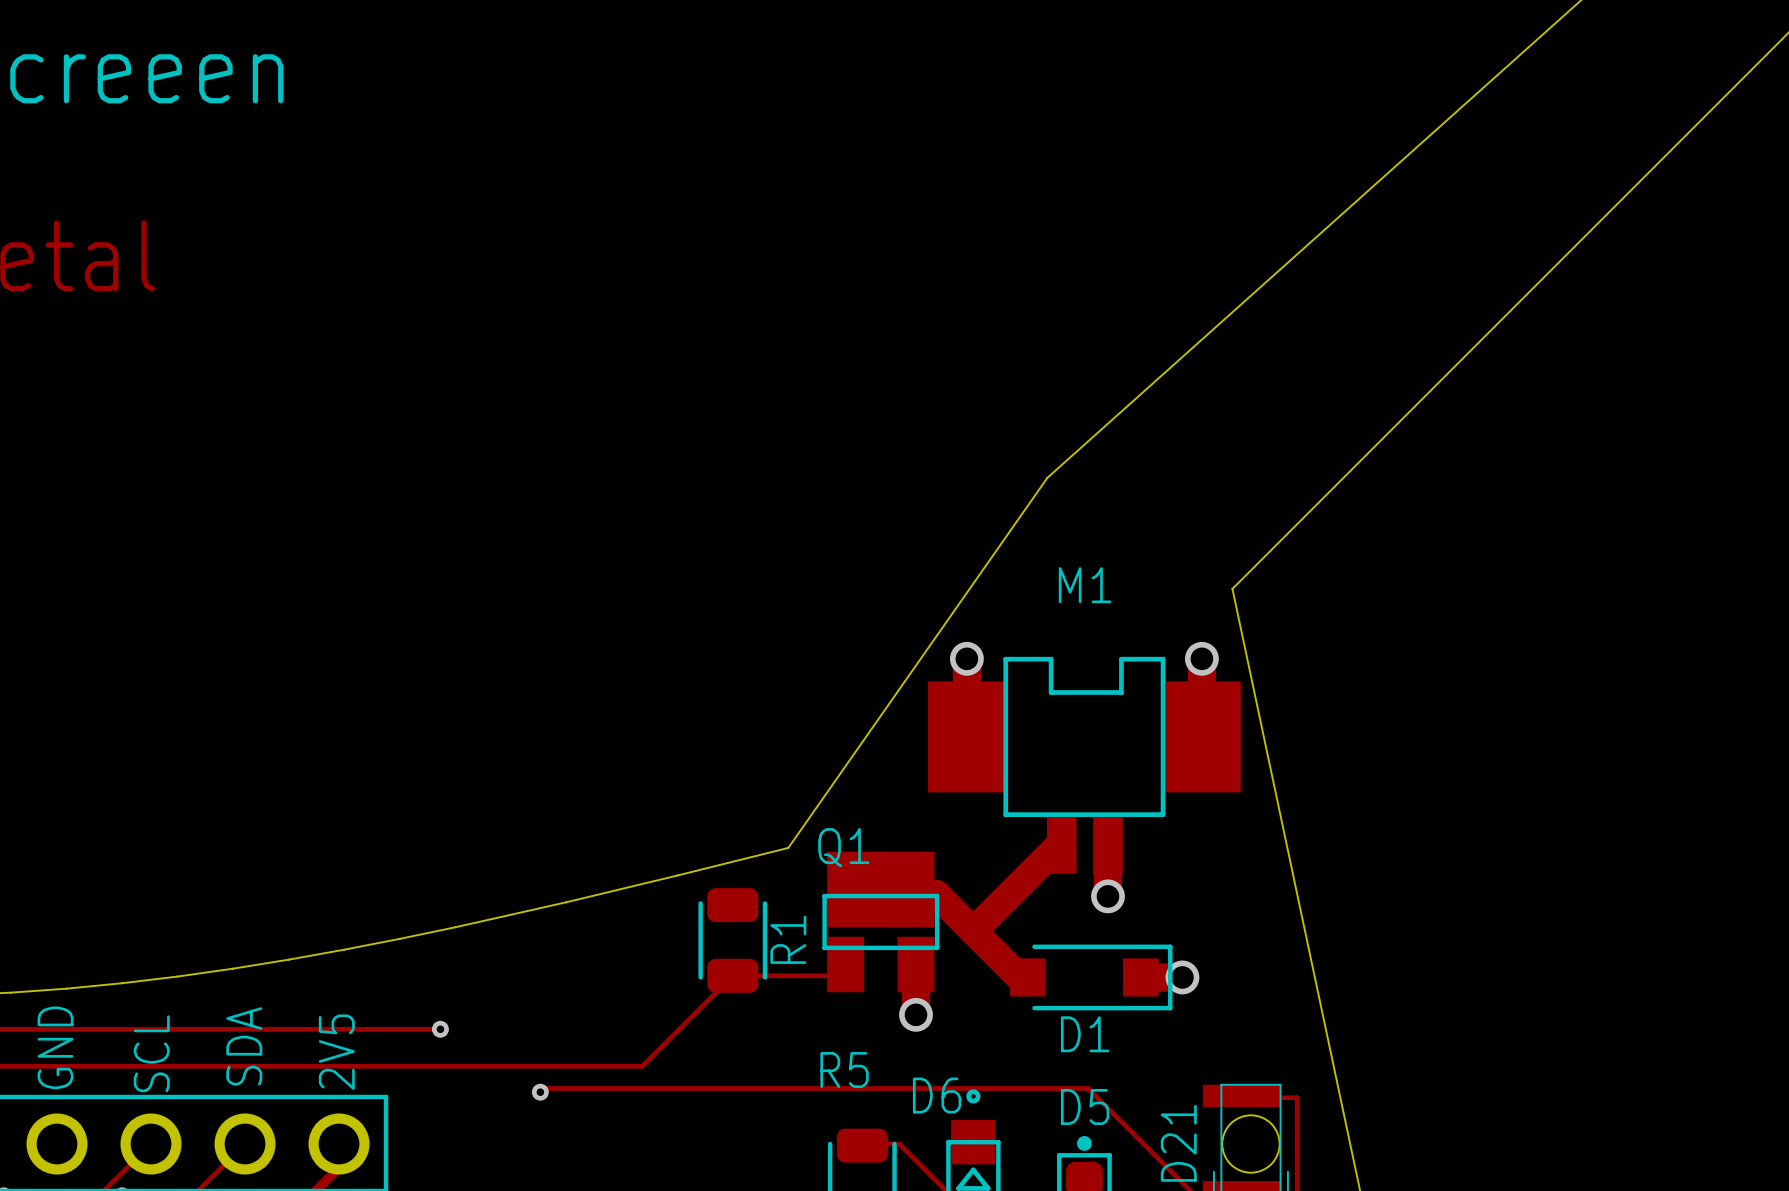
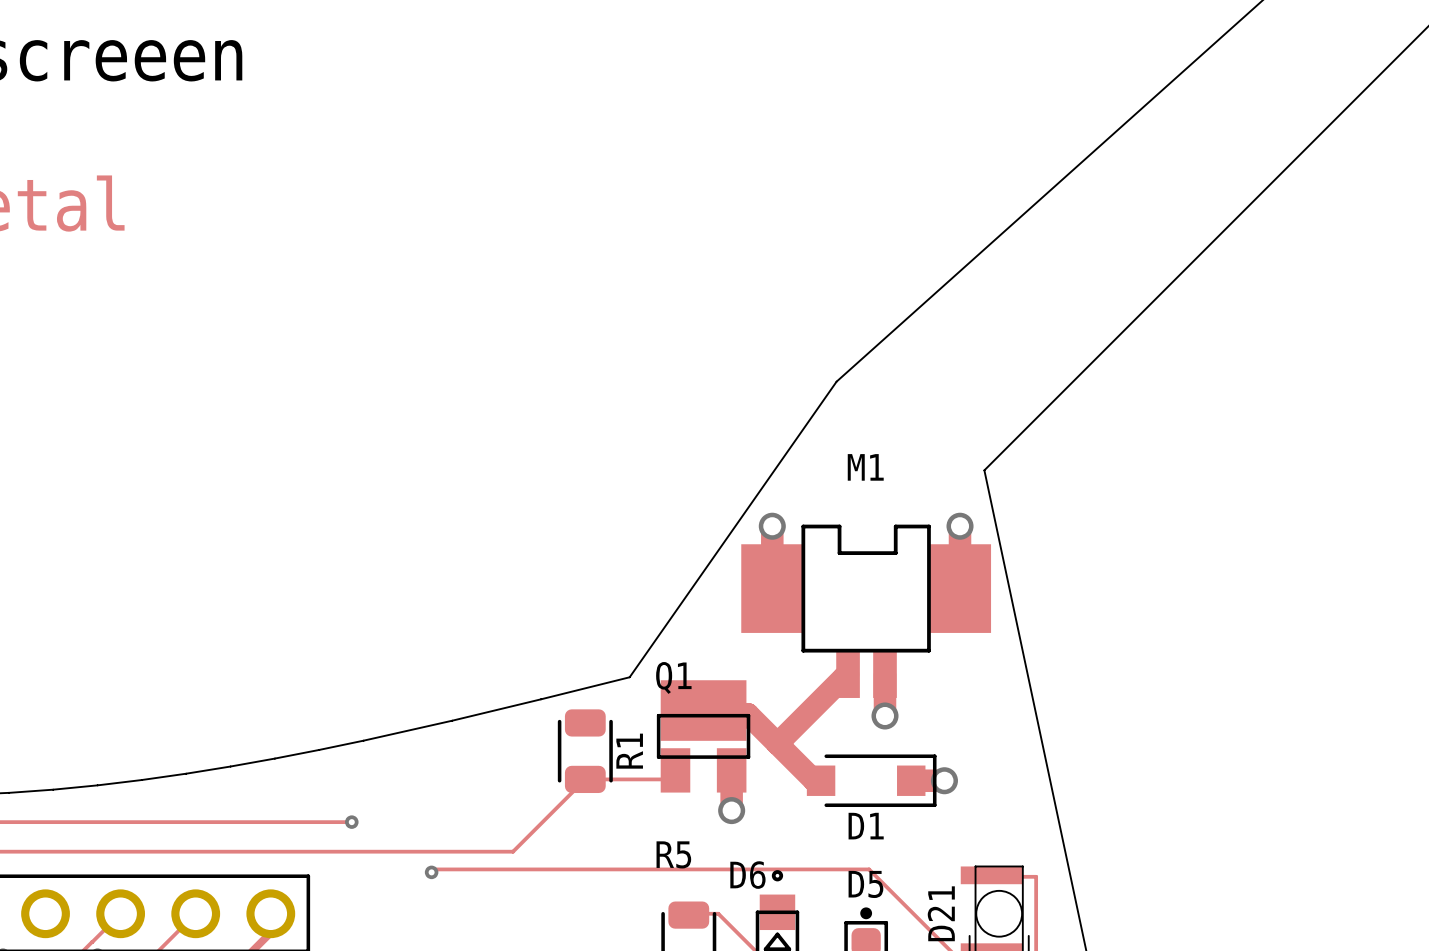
text: SDA (244, 1046) -> none
text: GND (55, 1047) -> none
text: 2V5 (336, 1052) -> none
text: SCL (151, 1053) -> none

